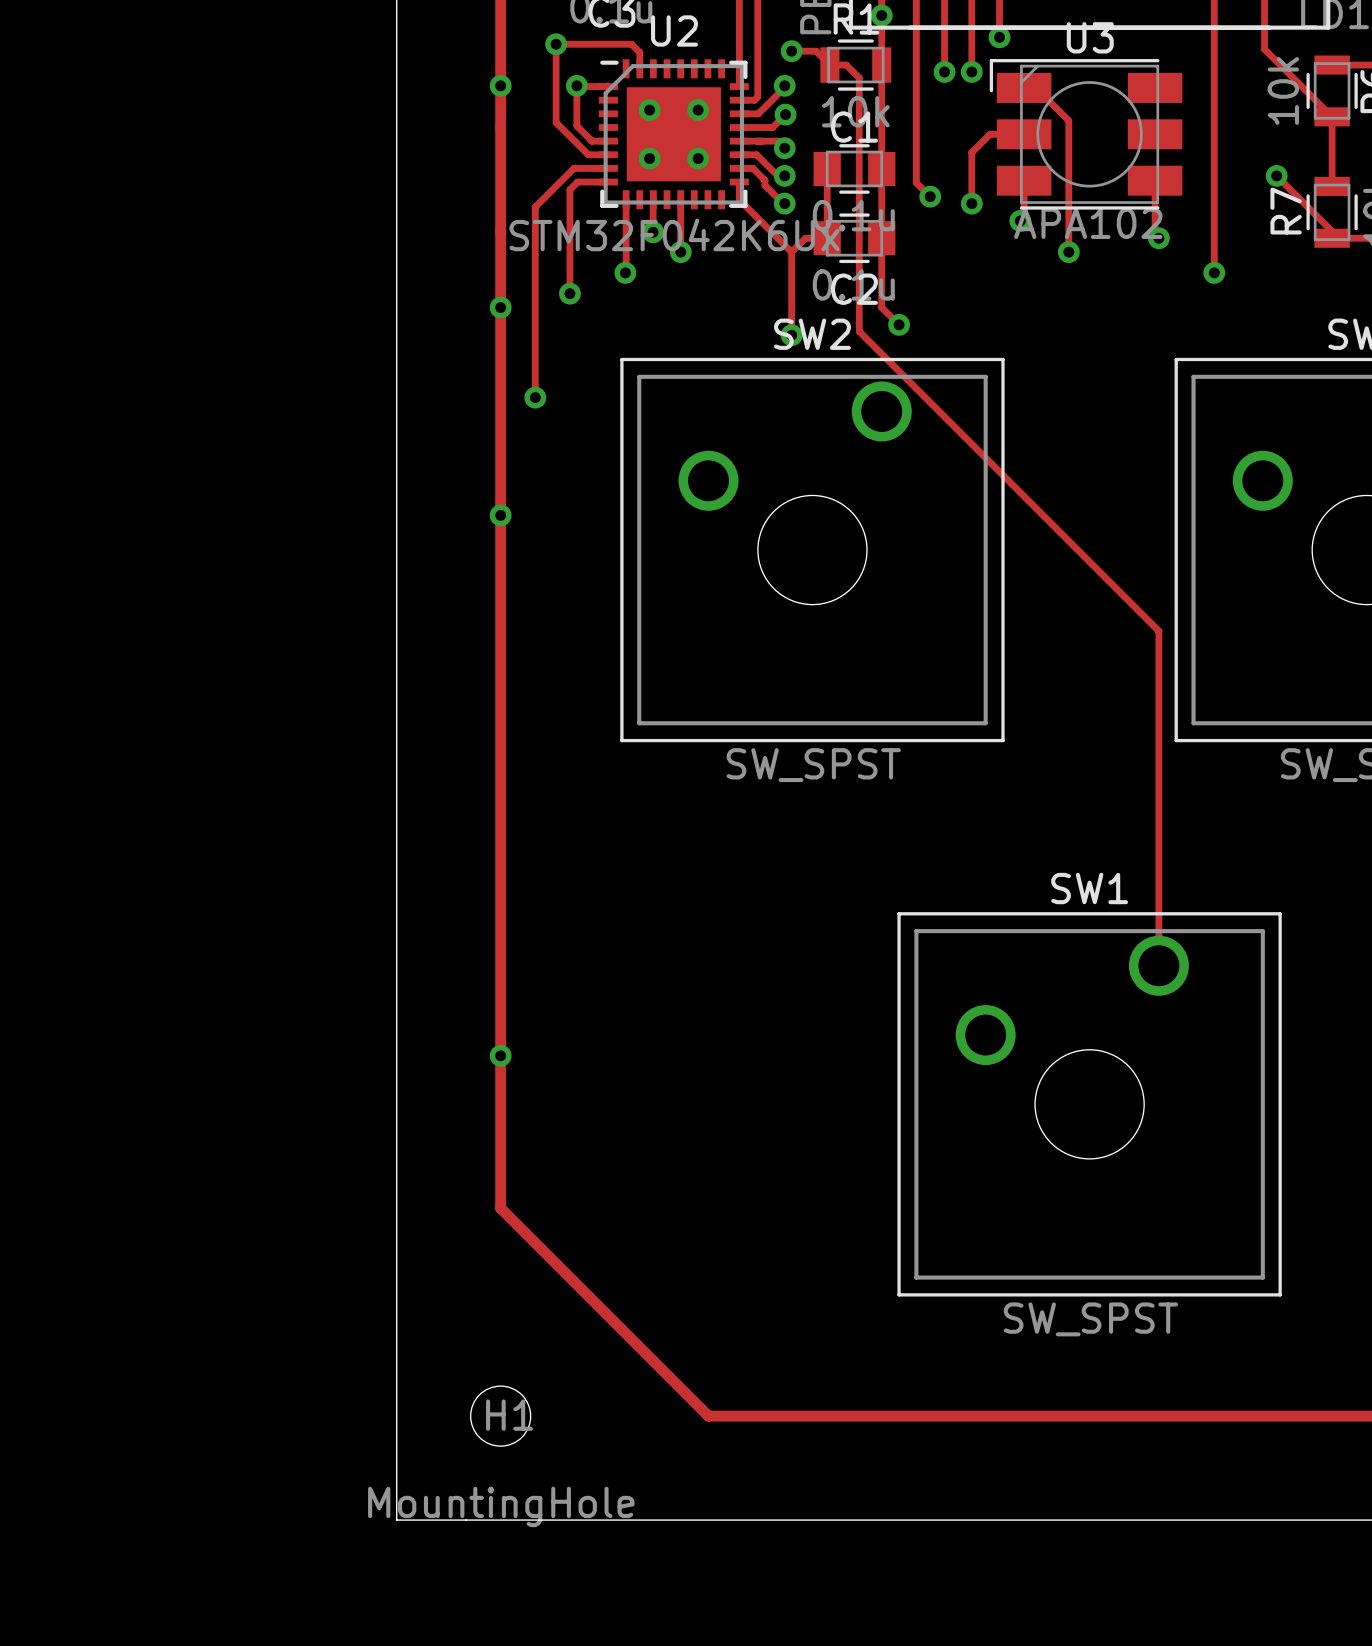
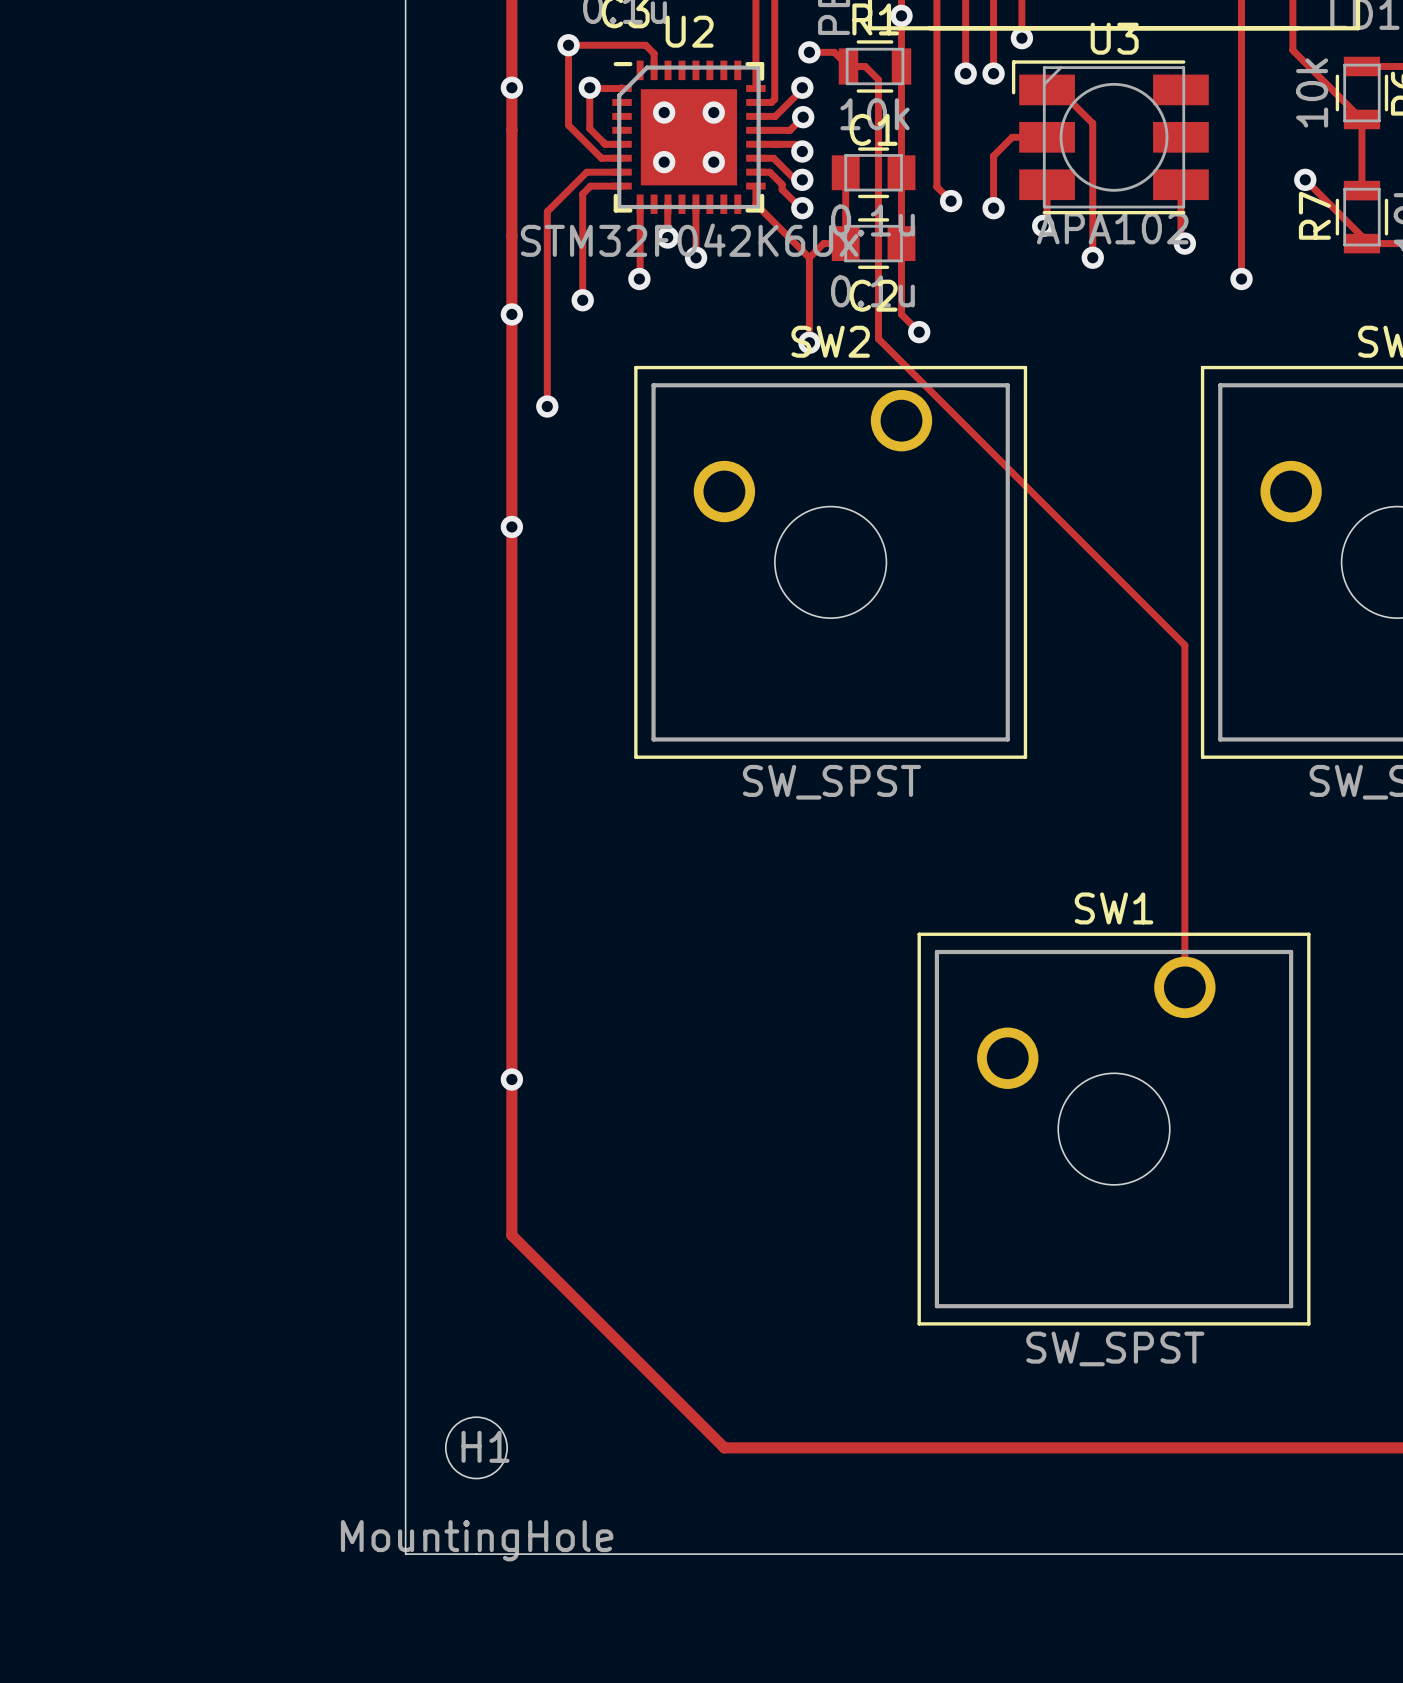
H1 position: (500, 1416) -> (476, 1447)

